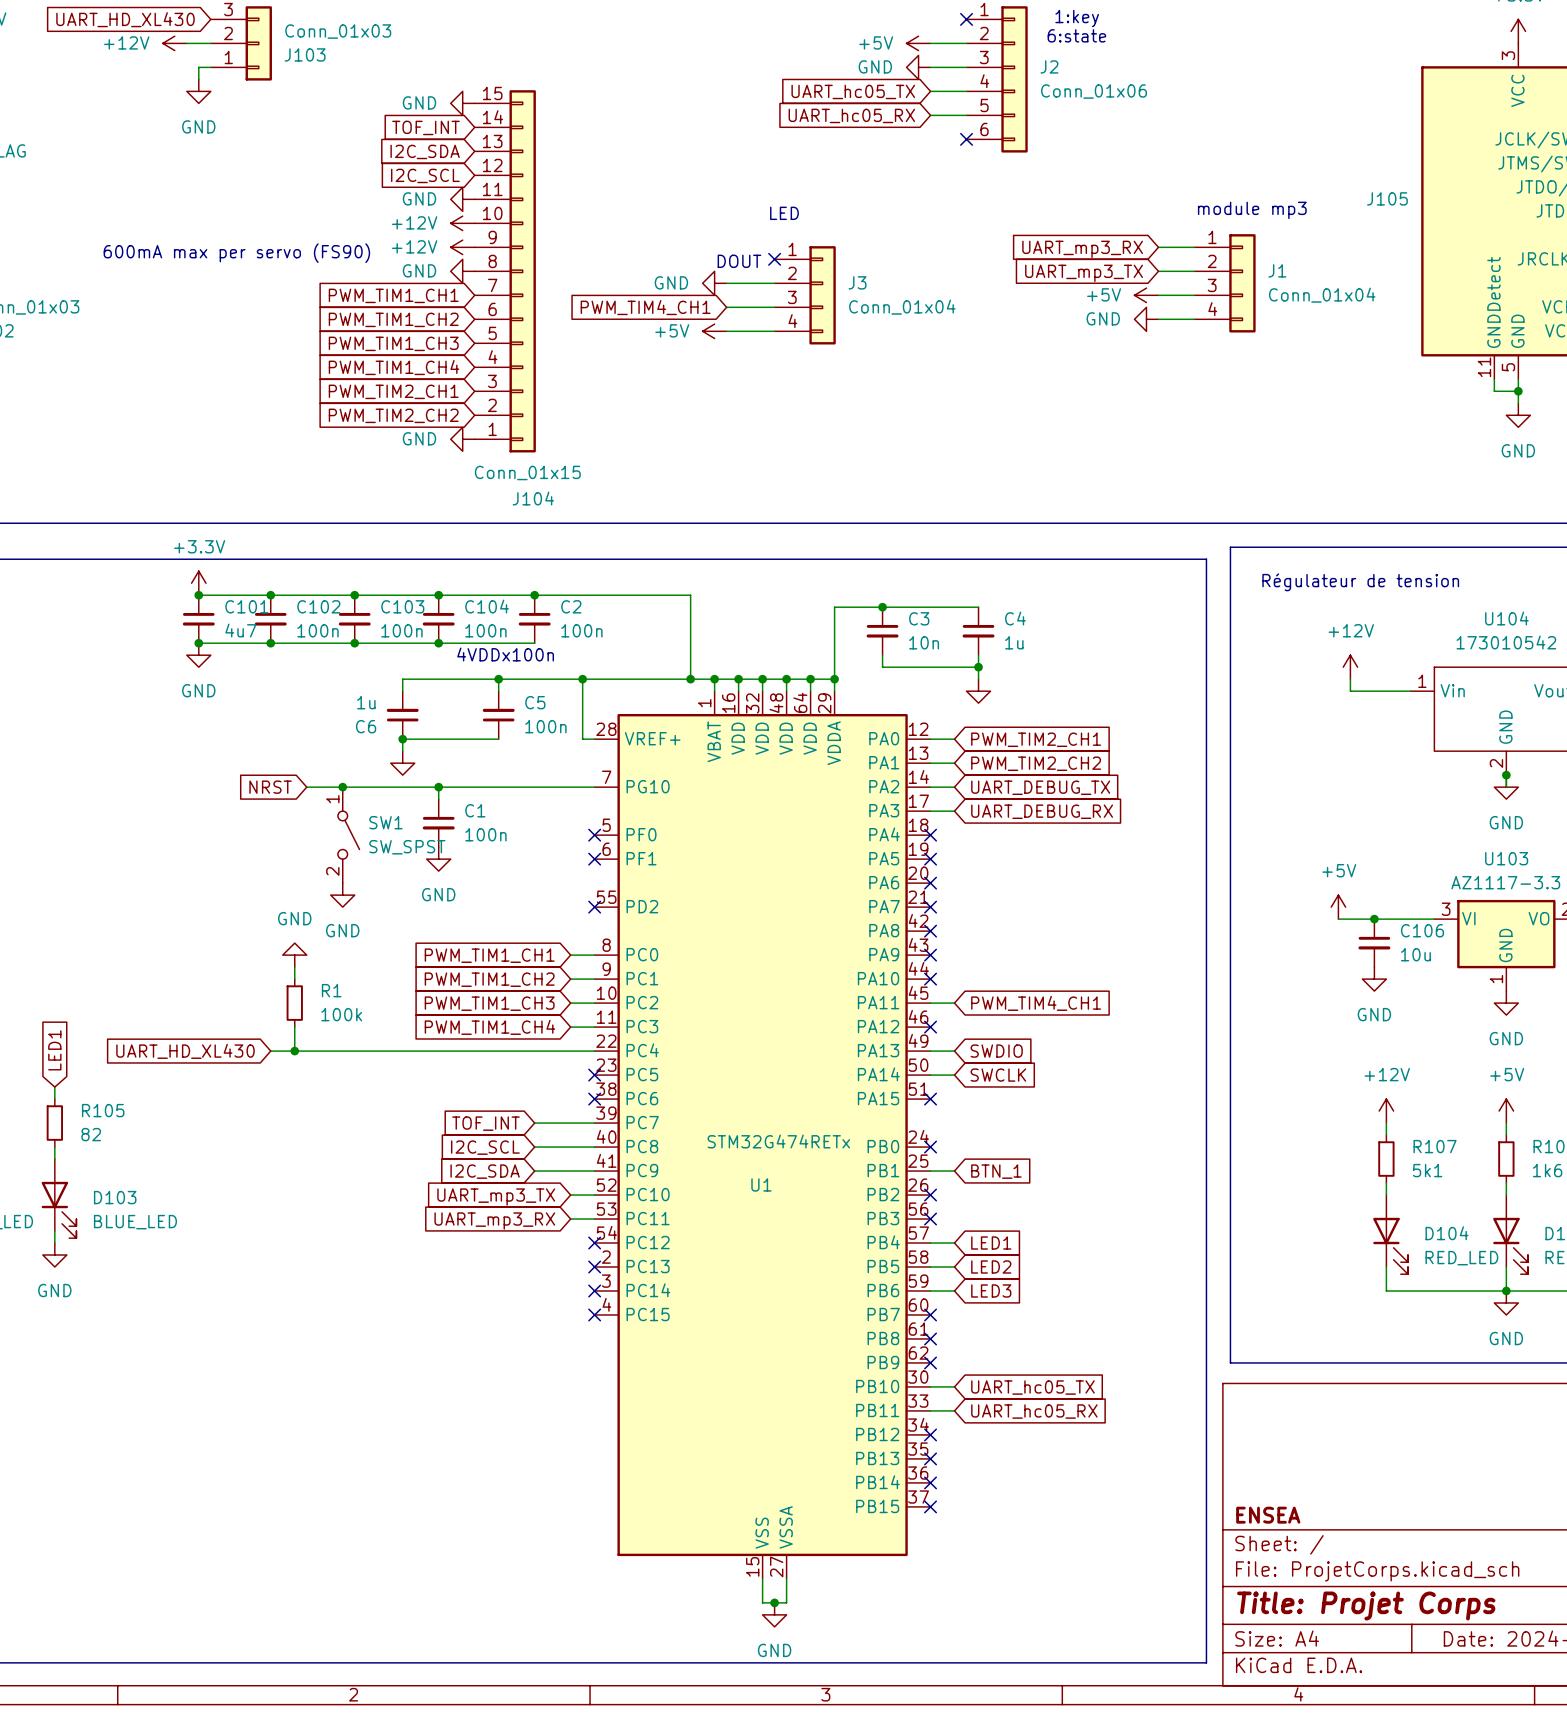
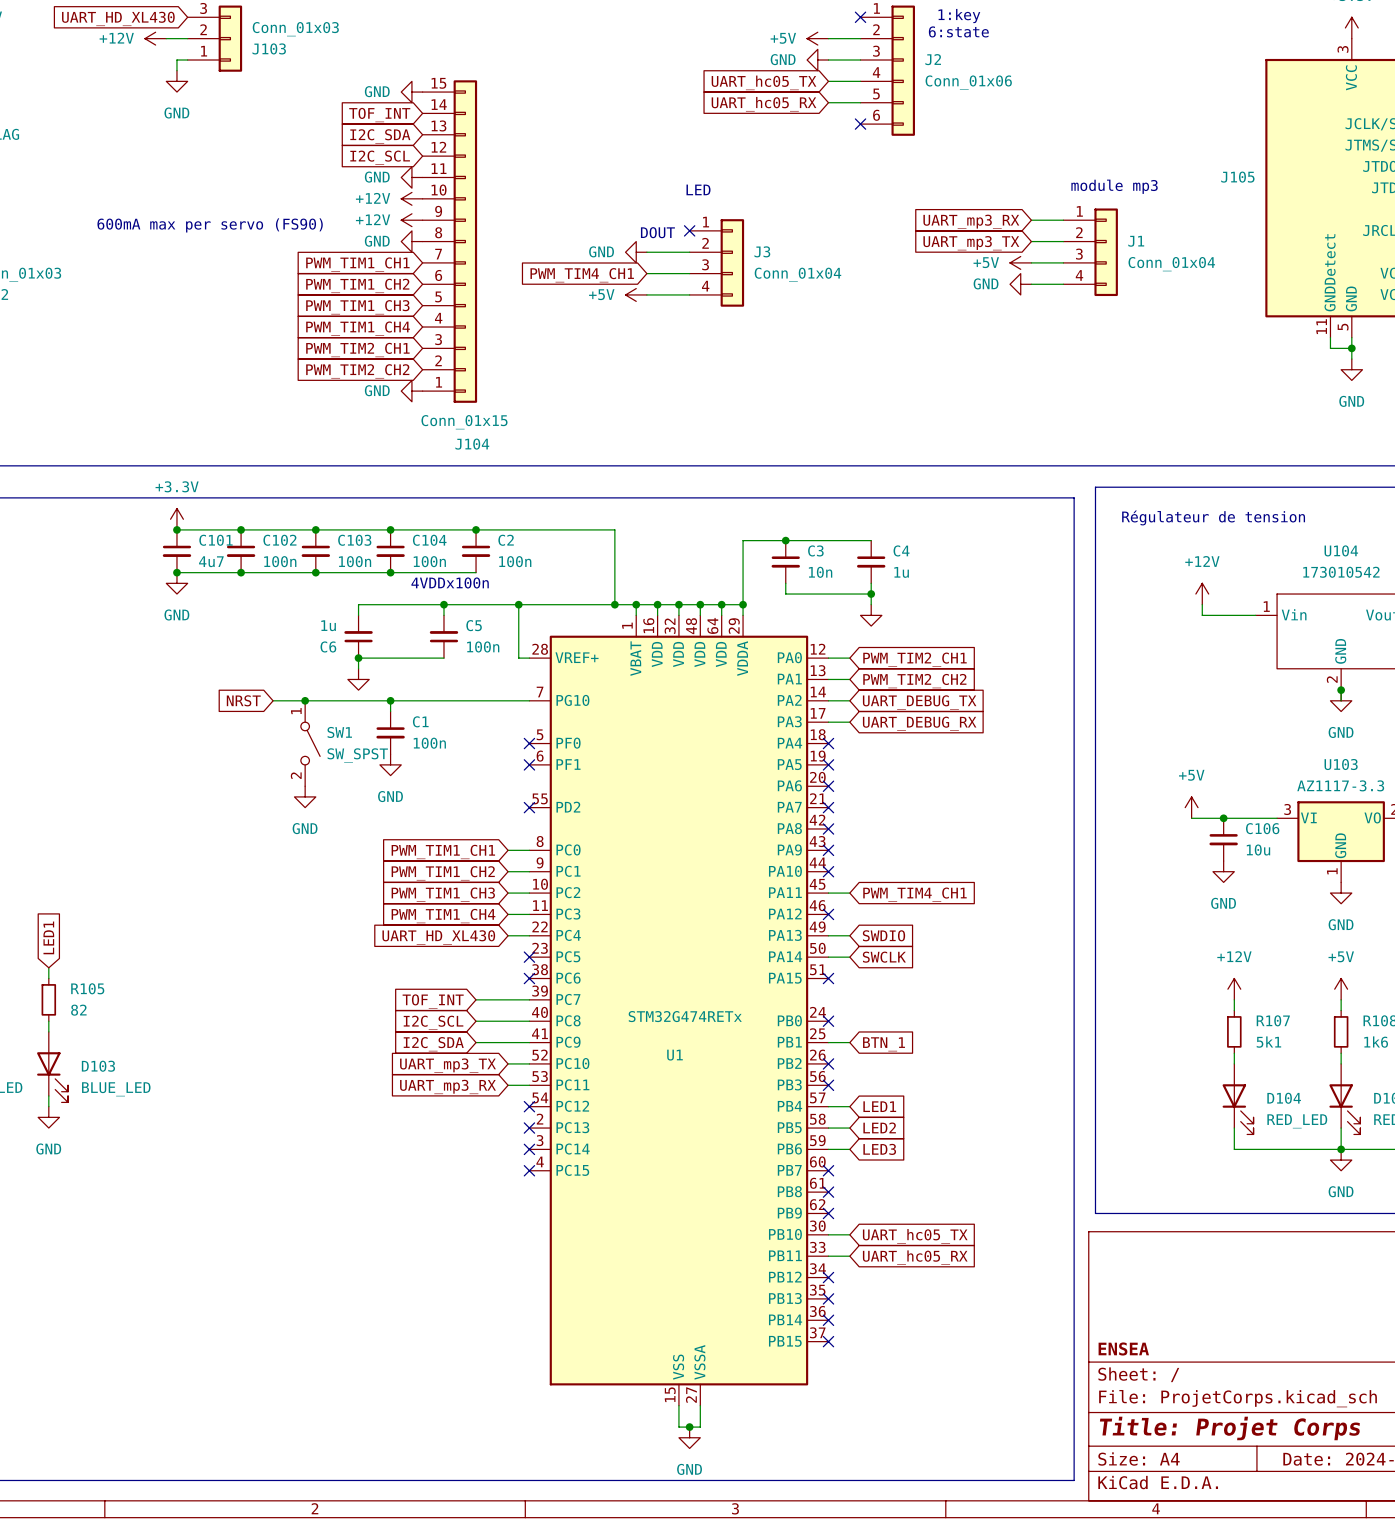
power symbol: GND (294, 955) -> none
wire: (294, 967) (294, 979) -> none
R1: 100k (294, 1003) -> none
wire: (294, 1027) (294, 1051) -> none
global label: UART_HD_XL430 (185, 1051) -> none
wire: (270, 1051) (570, 1051) -> none
junction: (294, 1051) -> none
global label: none -> UART_HD_XL430 (438, 937)

